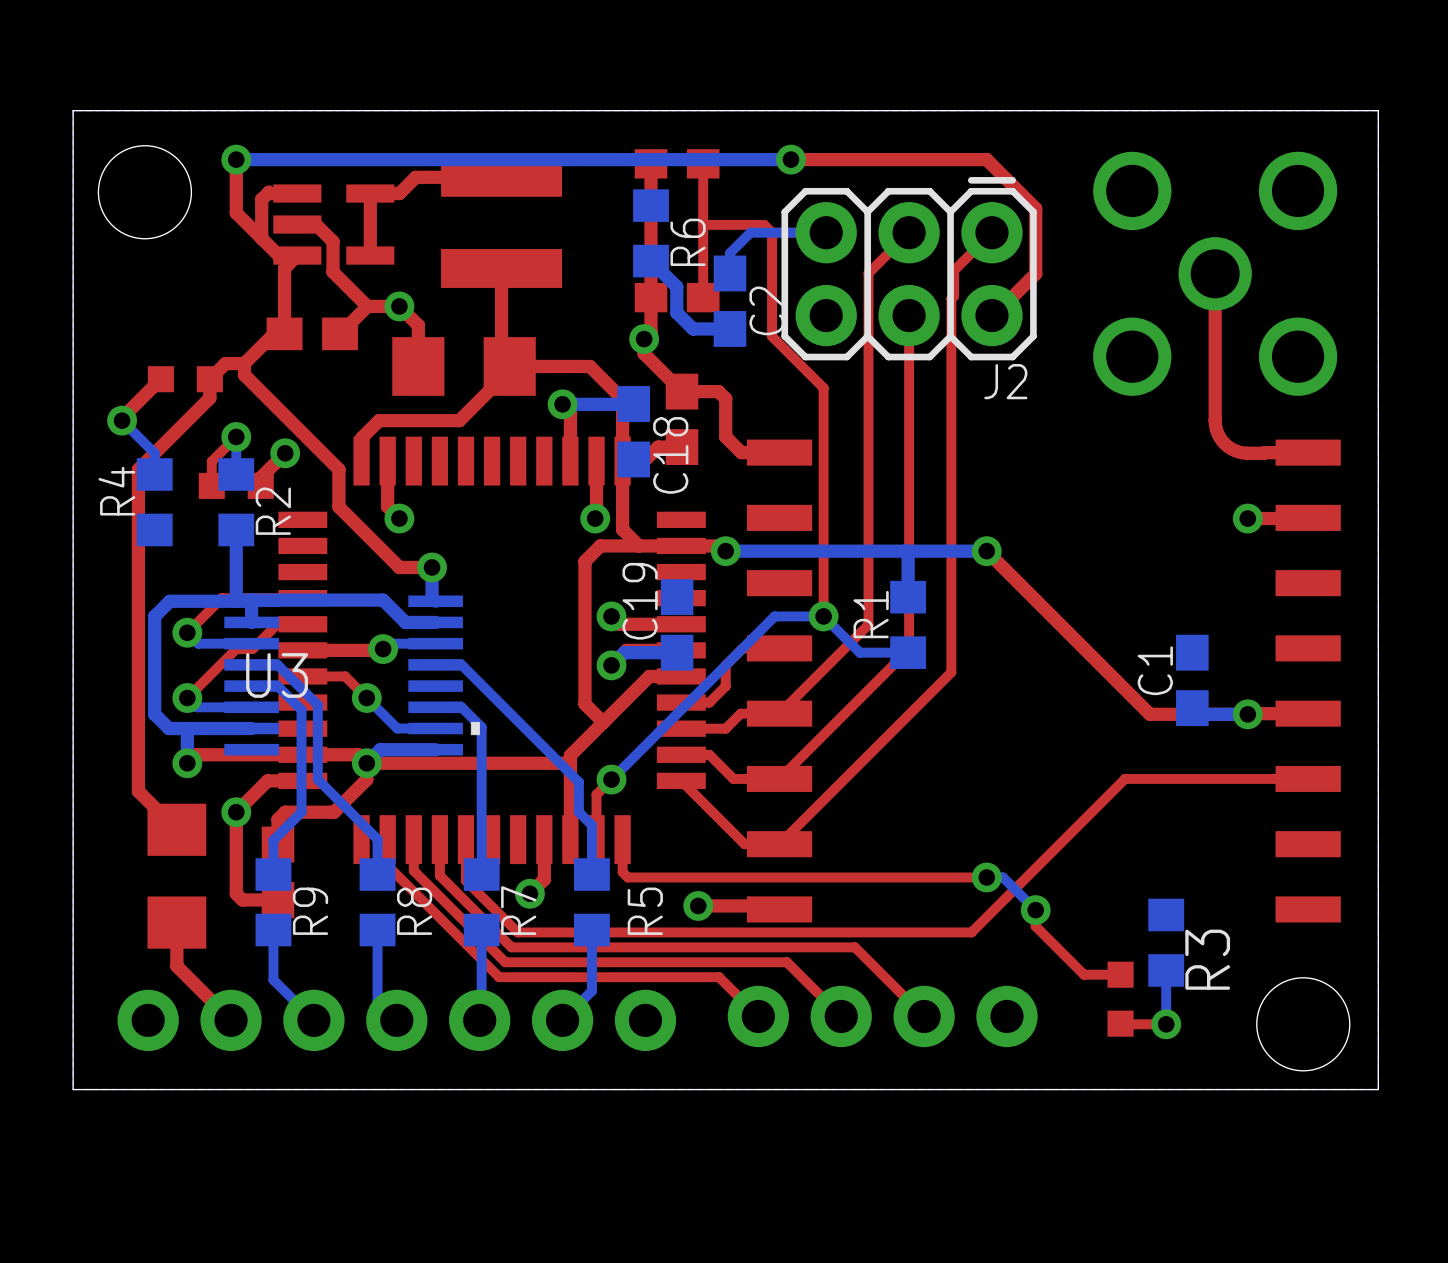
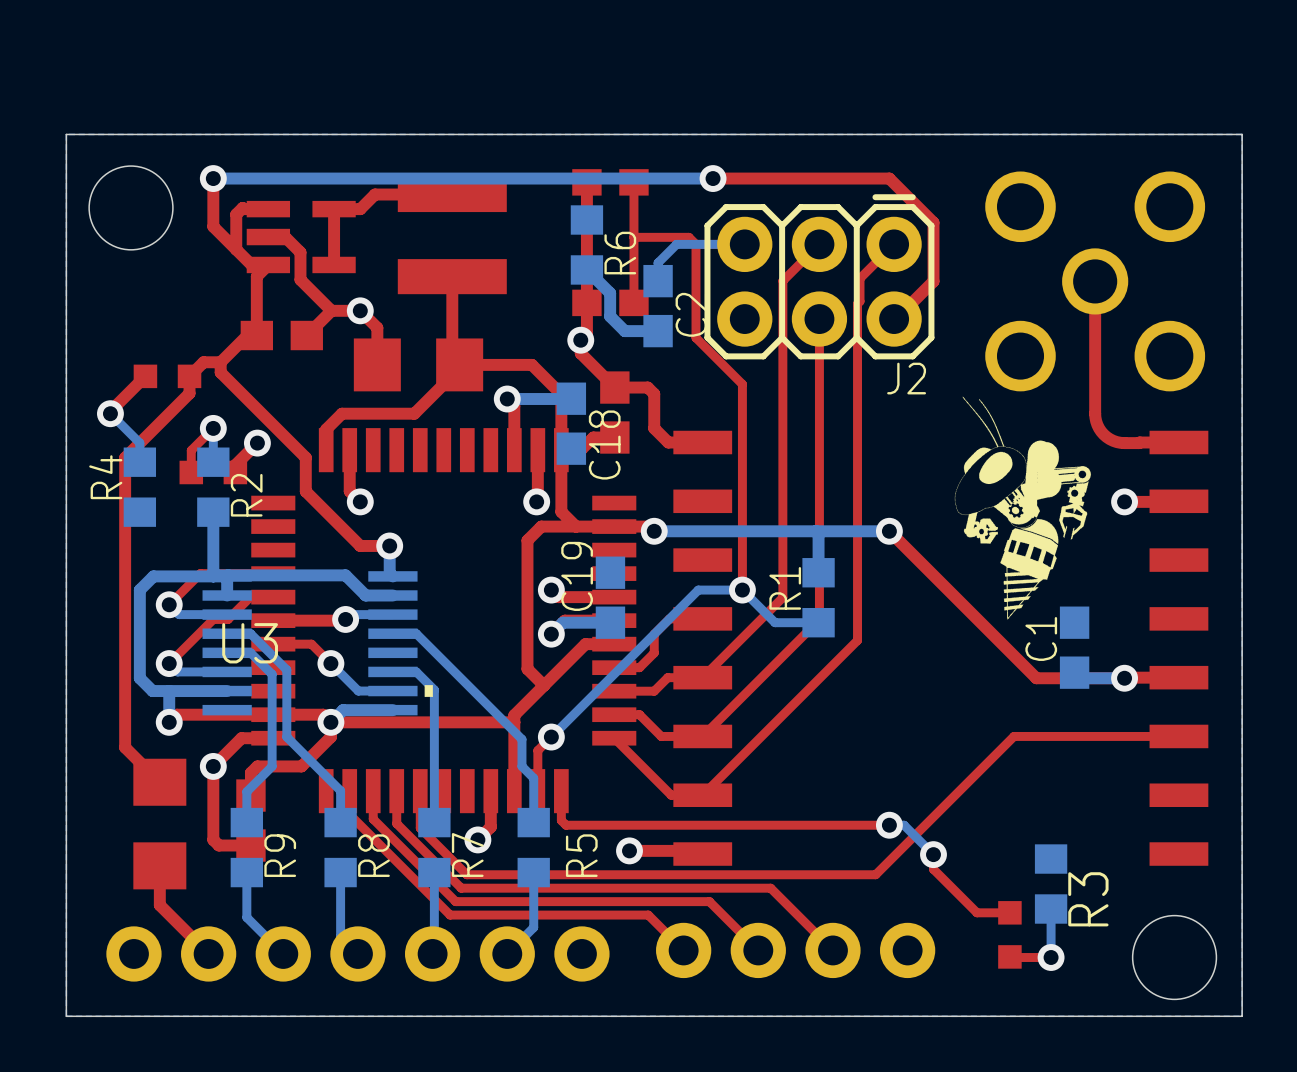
drawing: none -> [954, 396, 1092, 620]

